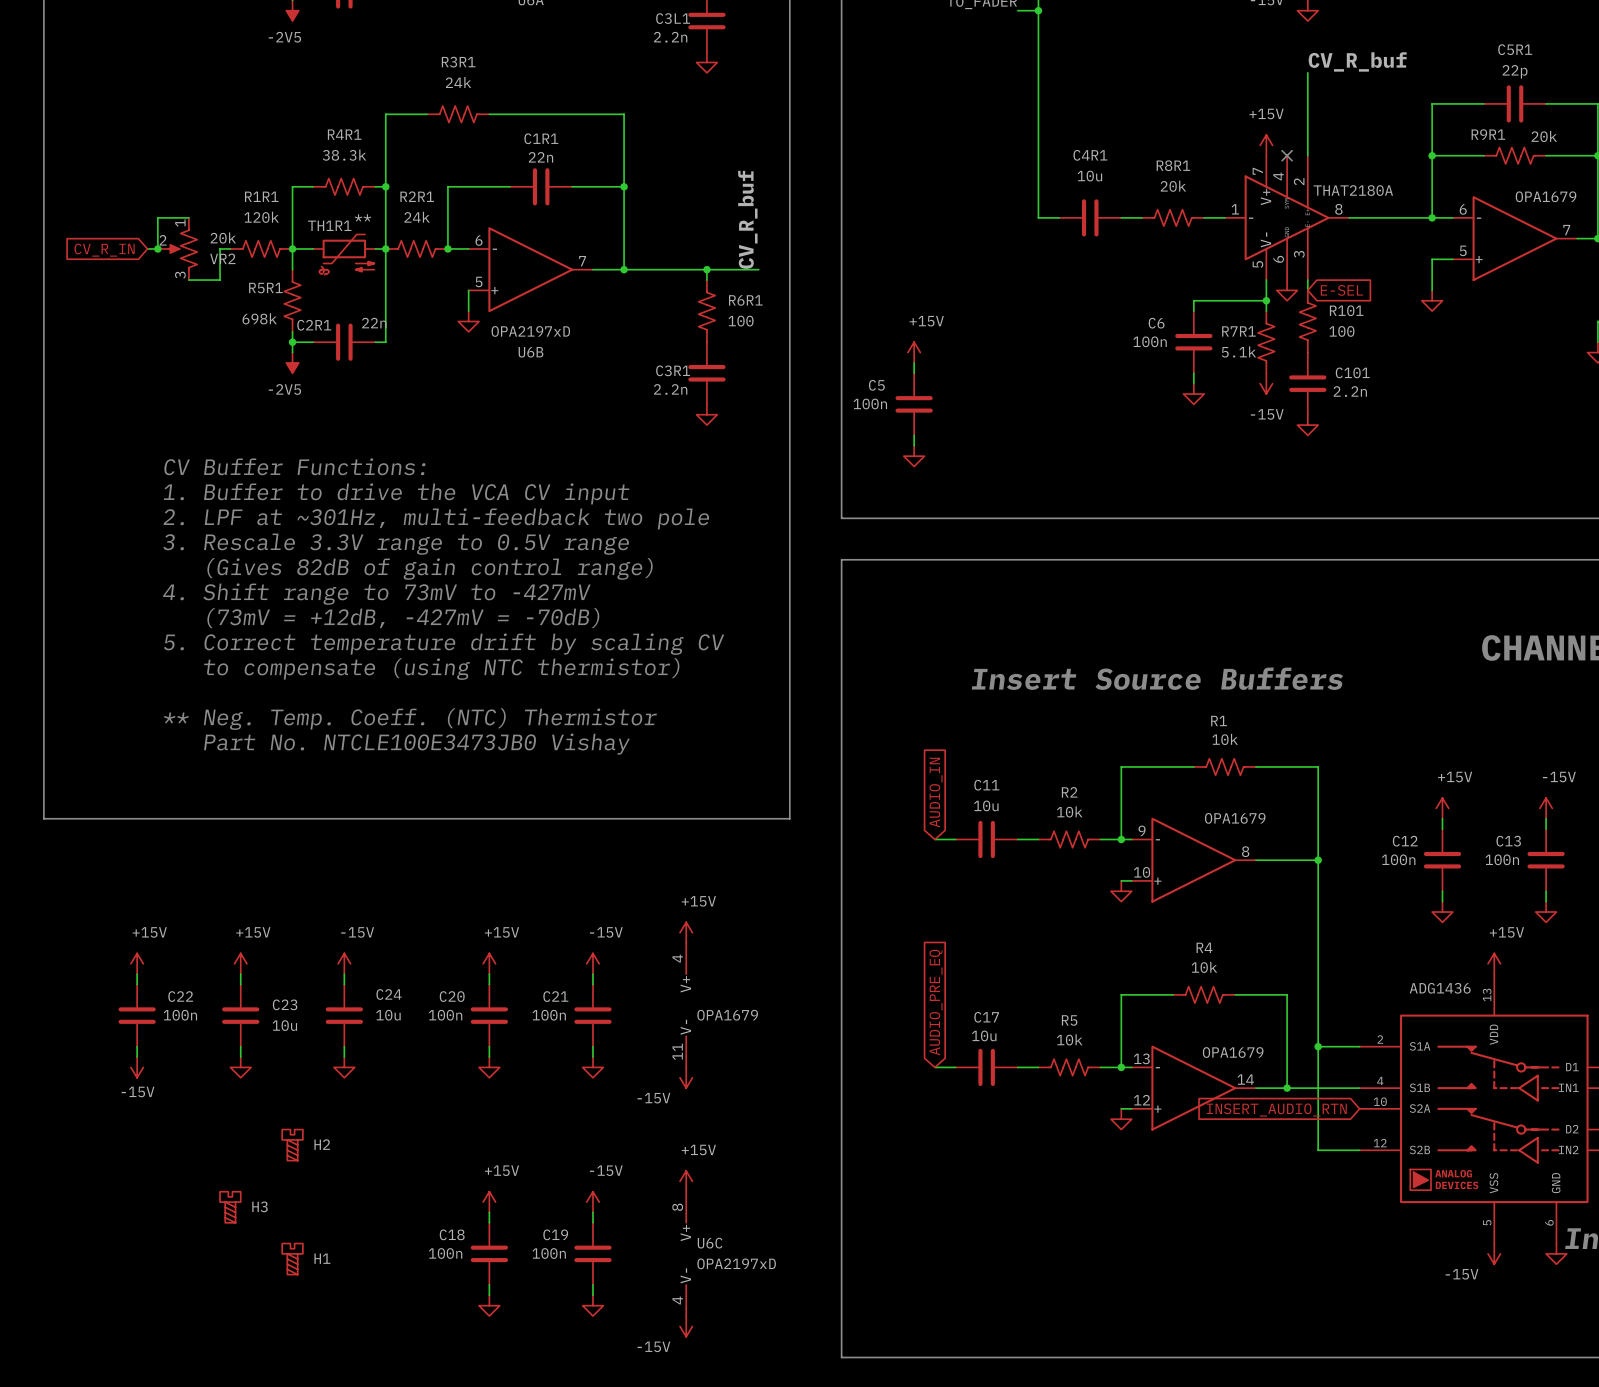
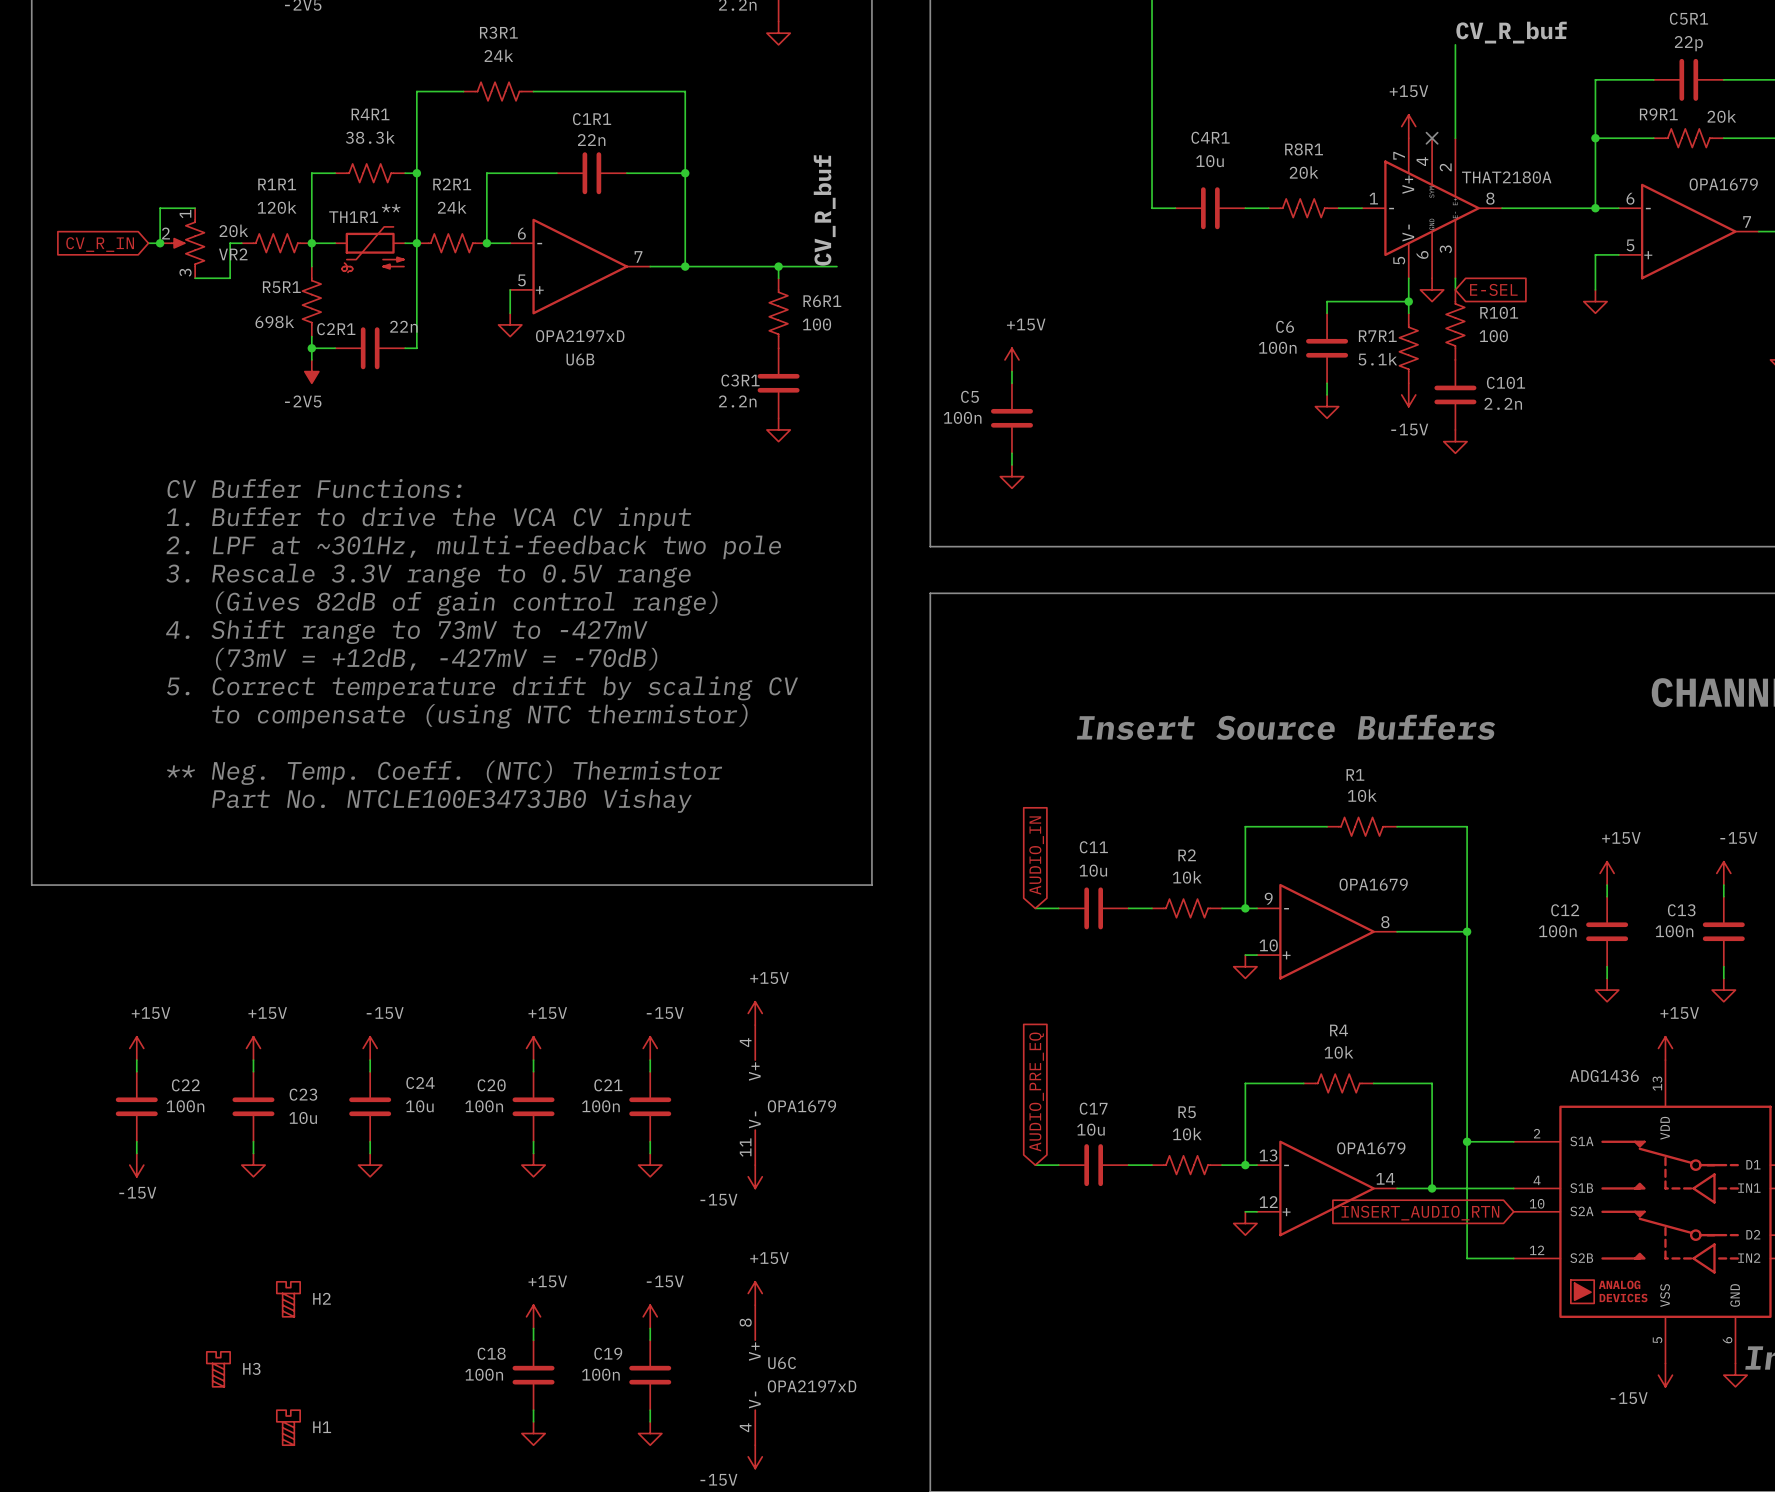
H2 position: (292, 1145) -> (288, 1299)
H3 position: (230, 1207) -> (218, 1369)
H1 position: (292, 1259) -> (288, 1427)

